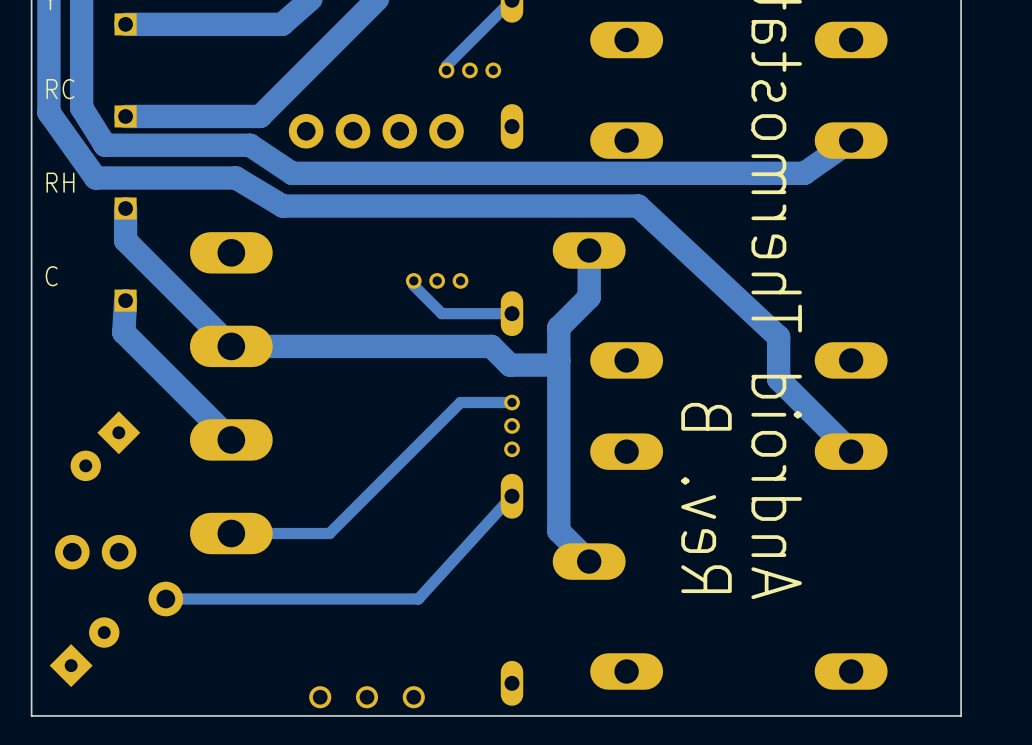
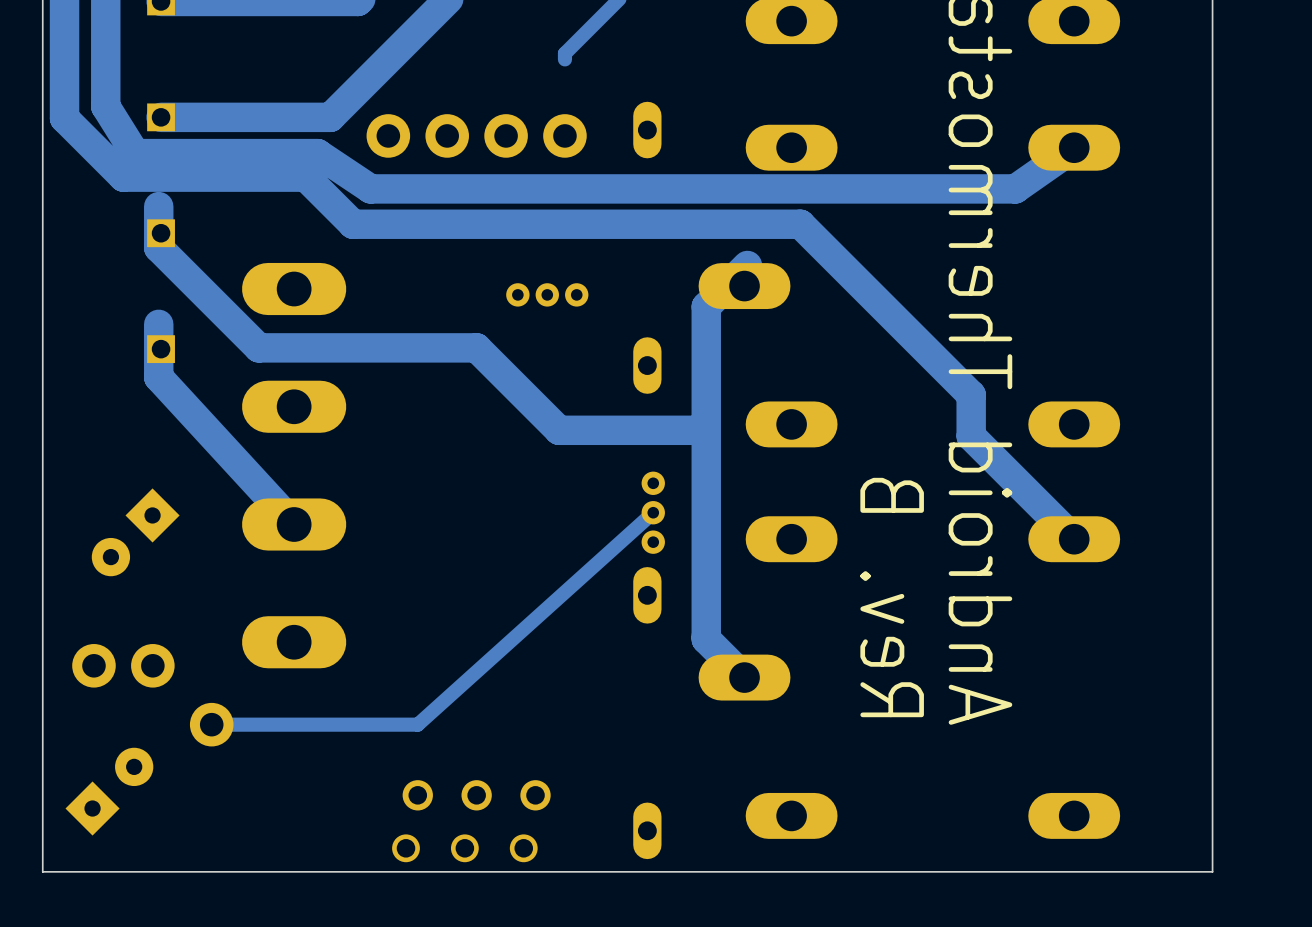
part: (469, 70) -> none
text: RC (60, 89) -> none
track: (48, 112) (95, 177) (236, 177) (282, 206) (638, 206) (778, 337) (778, 379) -> (64, 112) (64, 118) (123, 177) (305, 177) (353, 224) (800, 224) (971, 394) (971, 436) (982, 447)
text: RH (60, 182) -> none
track: (125, 208) (125, 240) (231, 346) (491, 346) (510, 365) -> (158, 206) (158, 247) (258, 347) (476, 347) (559, 430) (644, 430)
track: (589, 250) (589, 297) (558, 327) -> (747, 265) (706, 306) (706, 383)
part: none -> (547, 294)
text: C (51, 276) -> none
track: (413, 280) (413, 285) (441, 313) (512, 313) -> none
part: (437, 280) -> none
track: (125, 300) (123, 332) (231, 439) -> (158, 324) (158, 377) (294, 524)
part footprint: [504, 394, 520, 458] -> [641, 471, 665, 554]
track: (512, 402) (460, 402) (329, 533) (231, 533) -> none
track: (512, 496) (418, 598) (329, 598) -> (653, 512) (417, 724)
part: none -> (476, 795)

